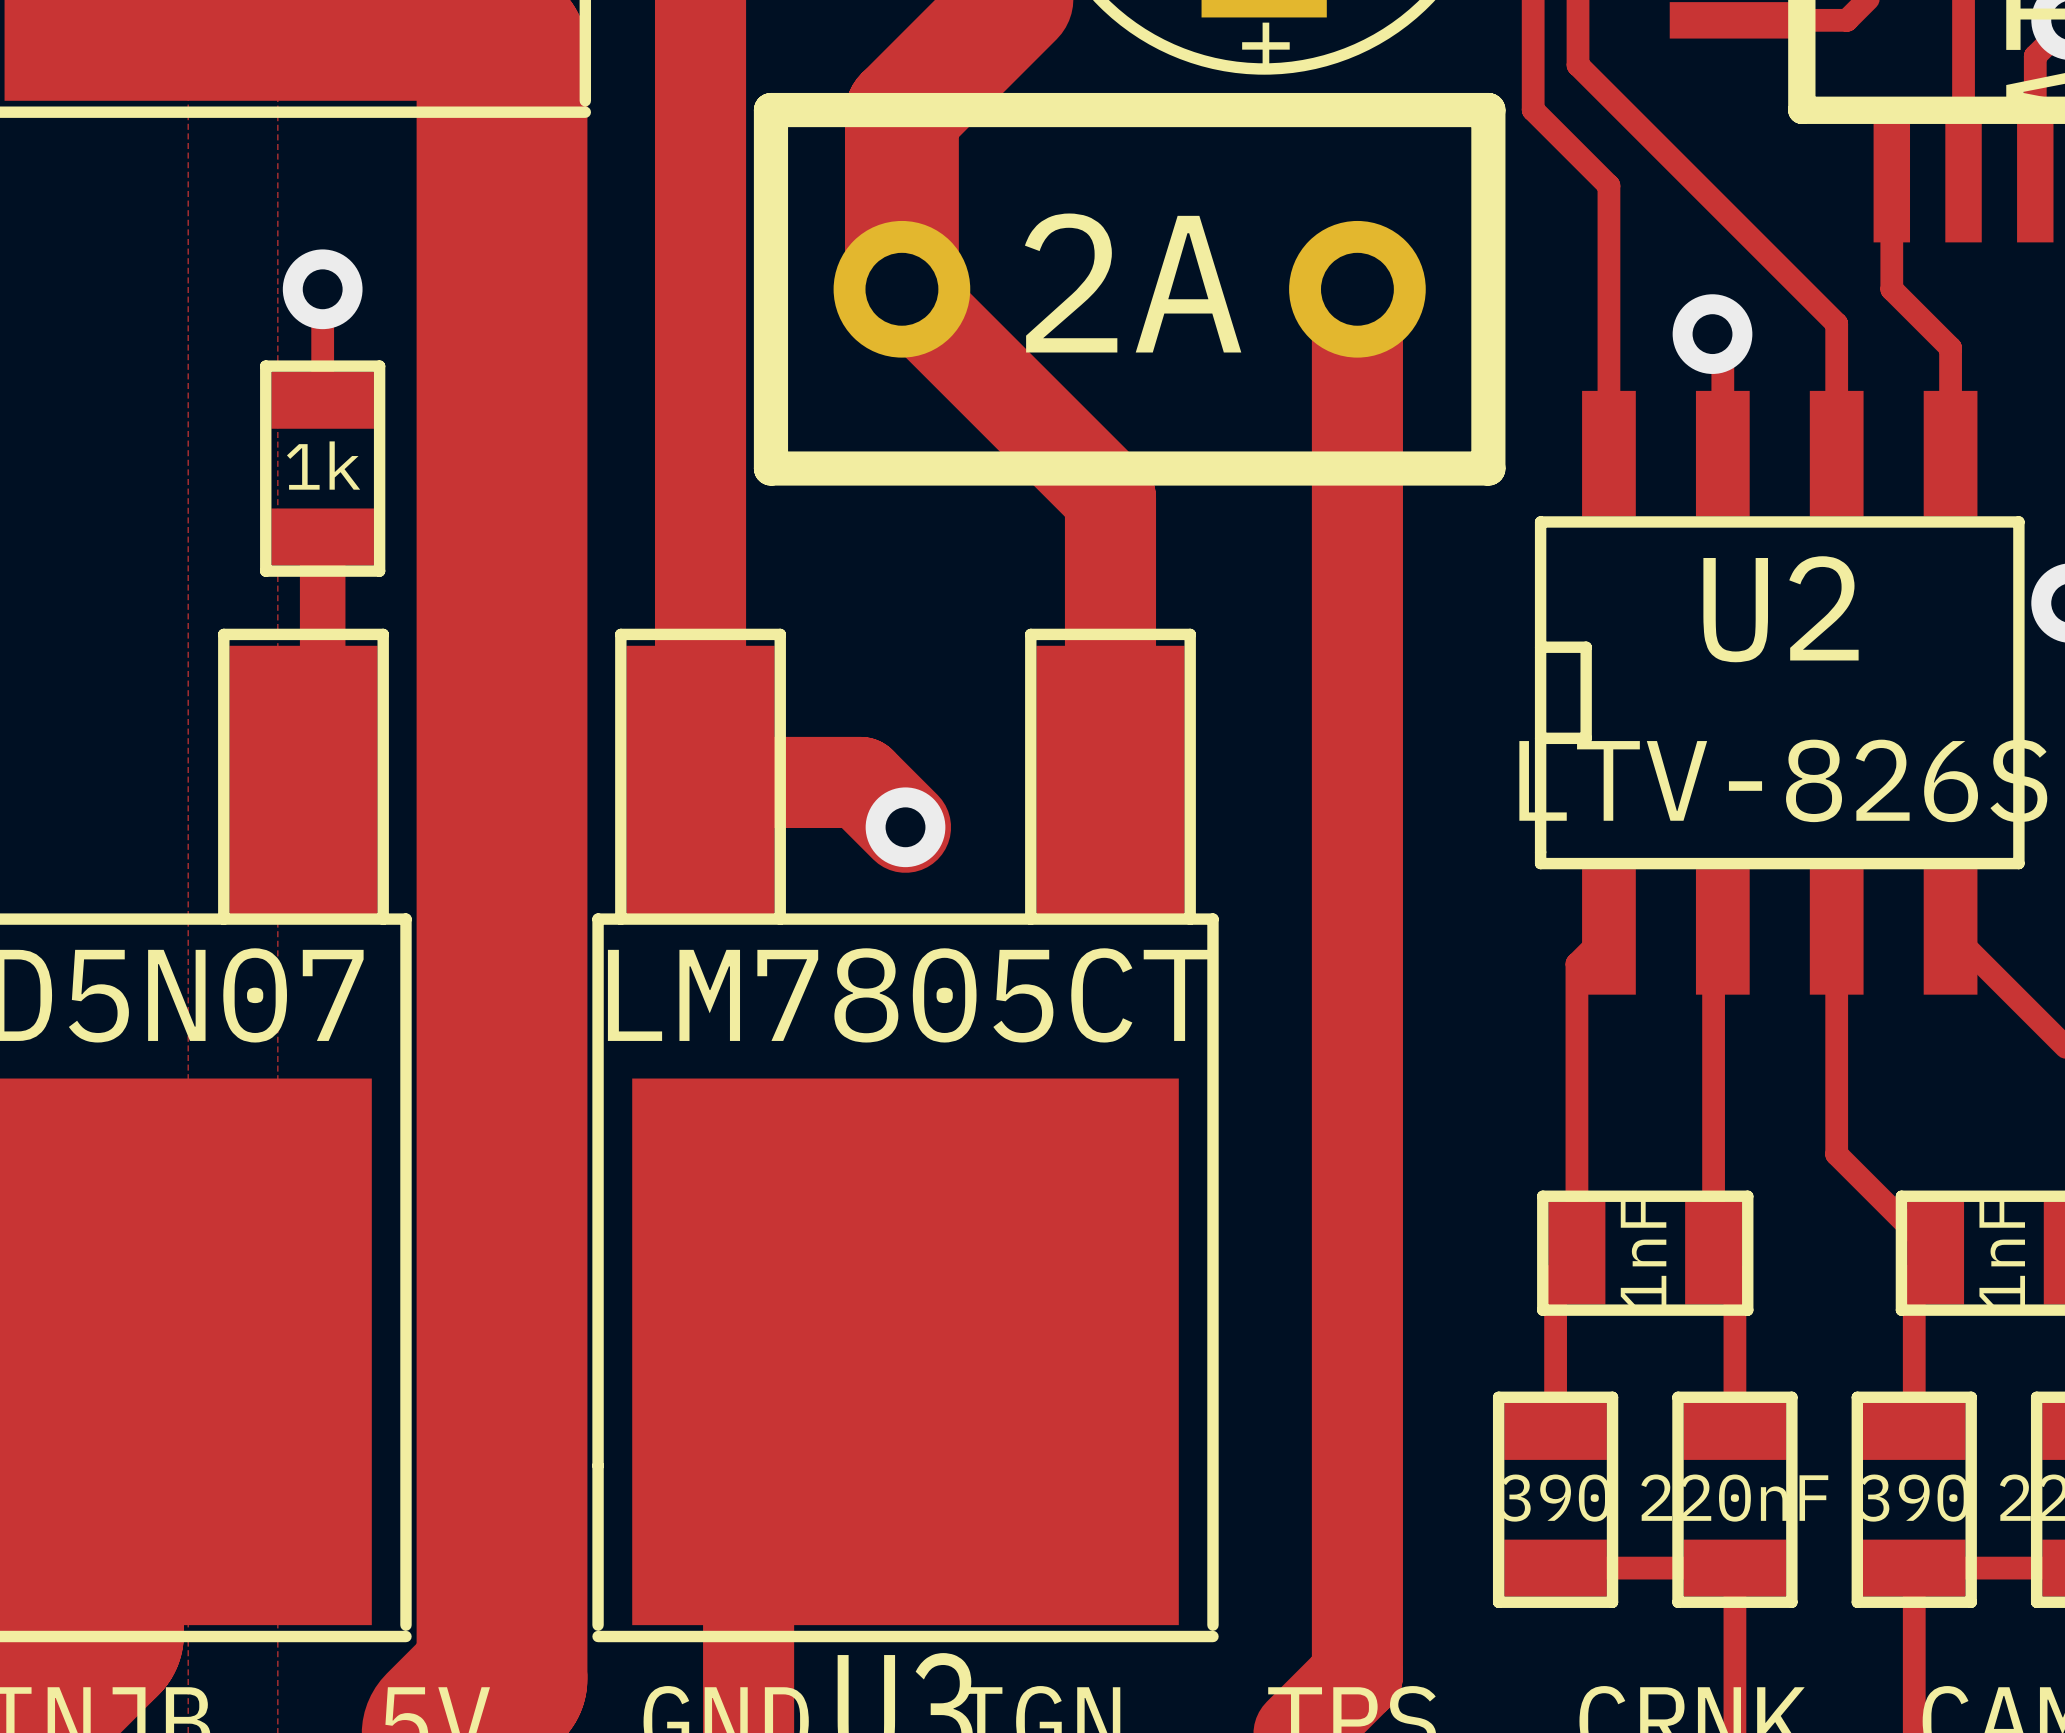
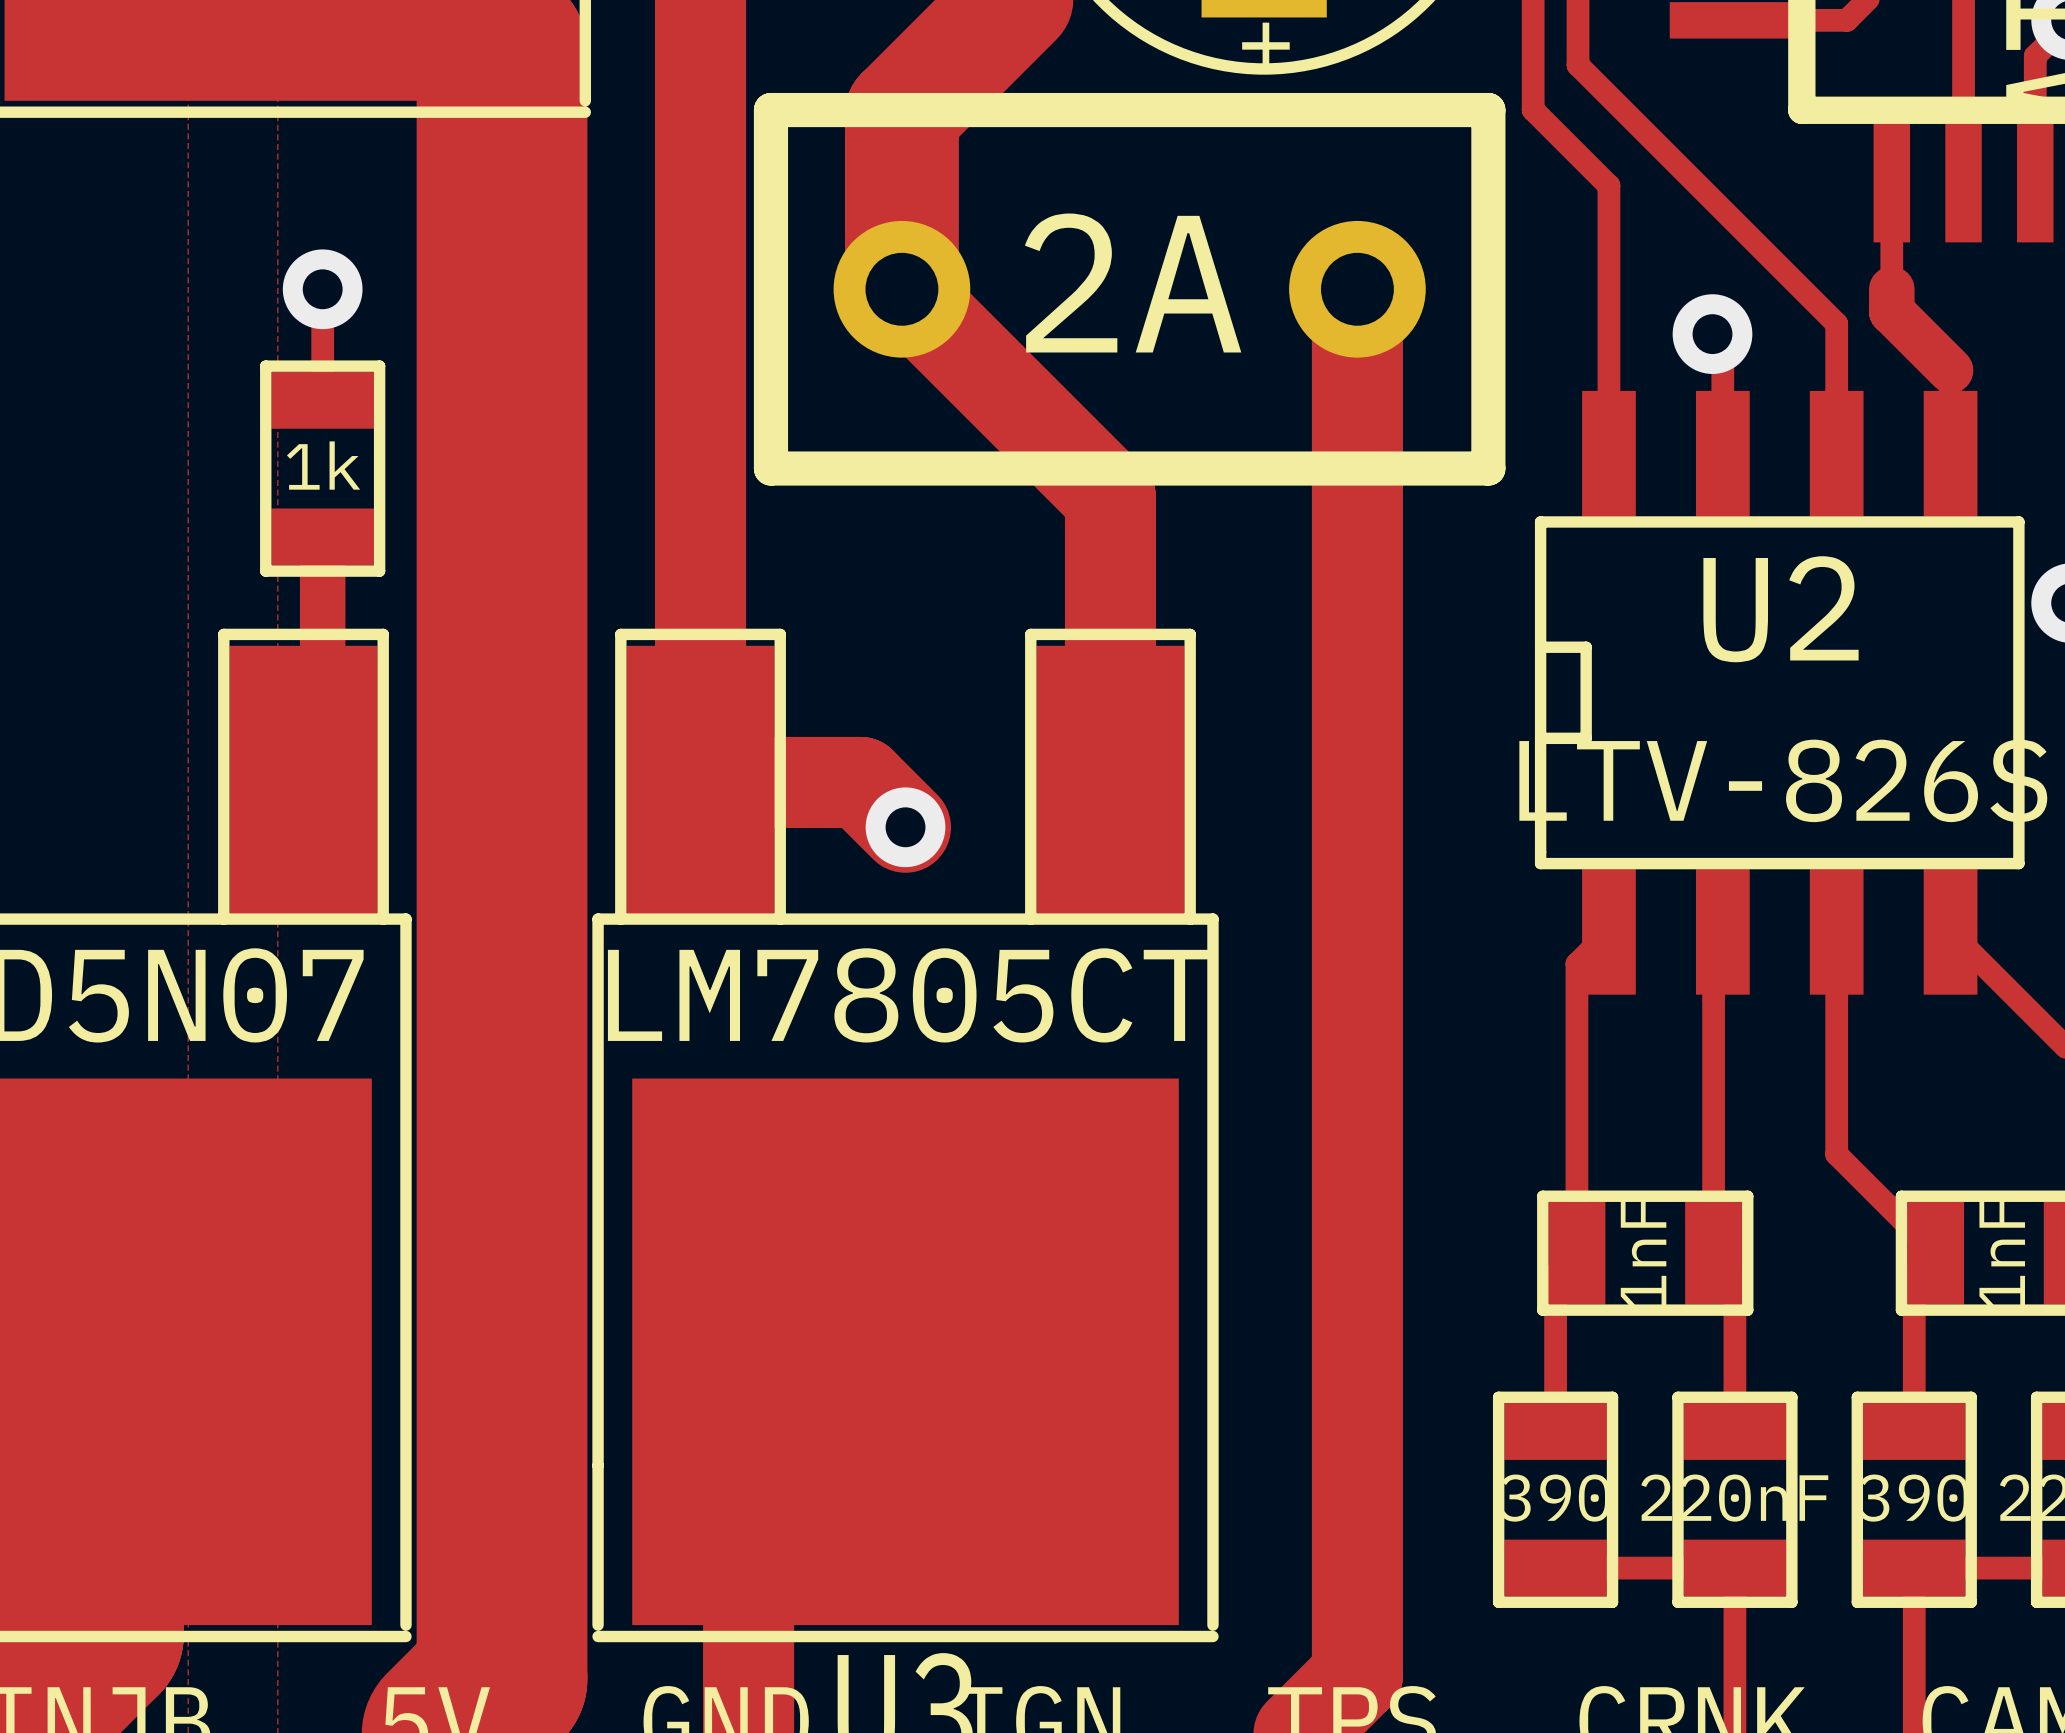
track: (1891, 289) (1950, 348) (1950, 370) -> (1891, 289) (1891, 311) (1950, 370)

